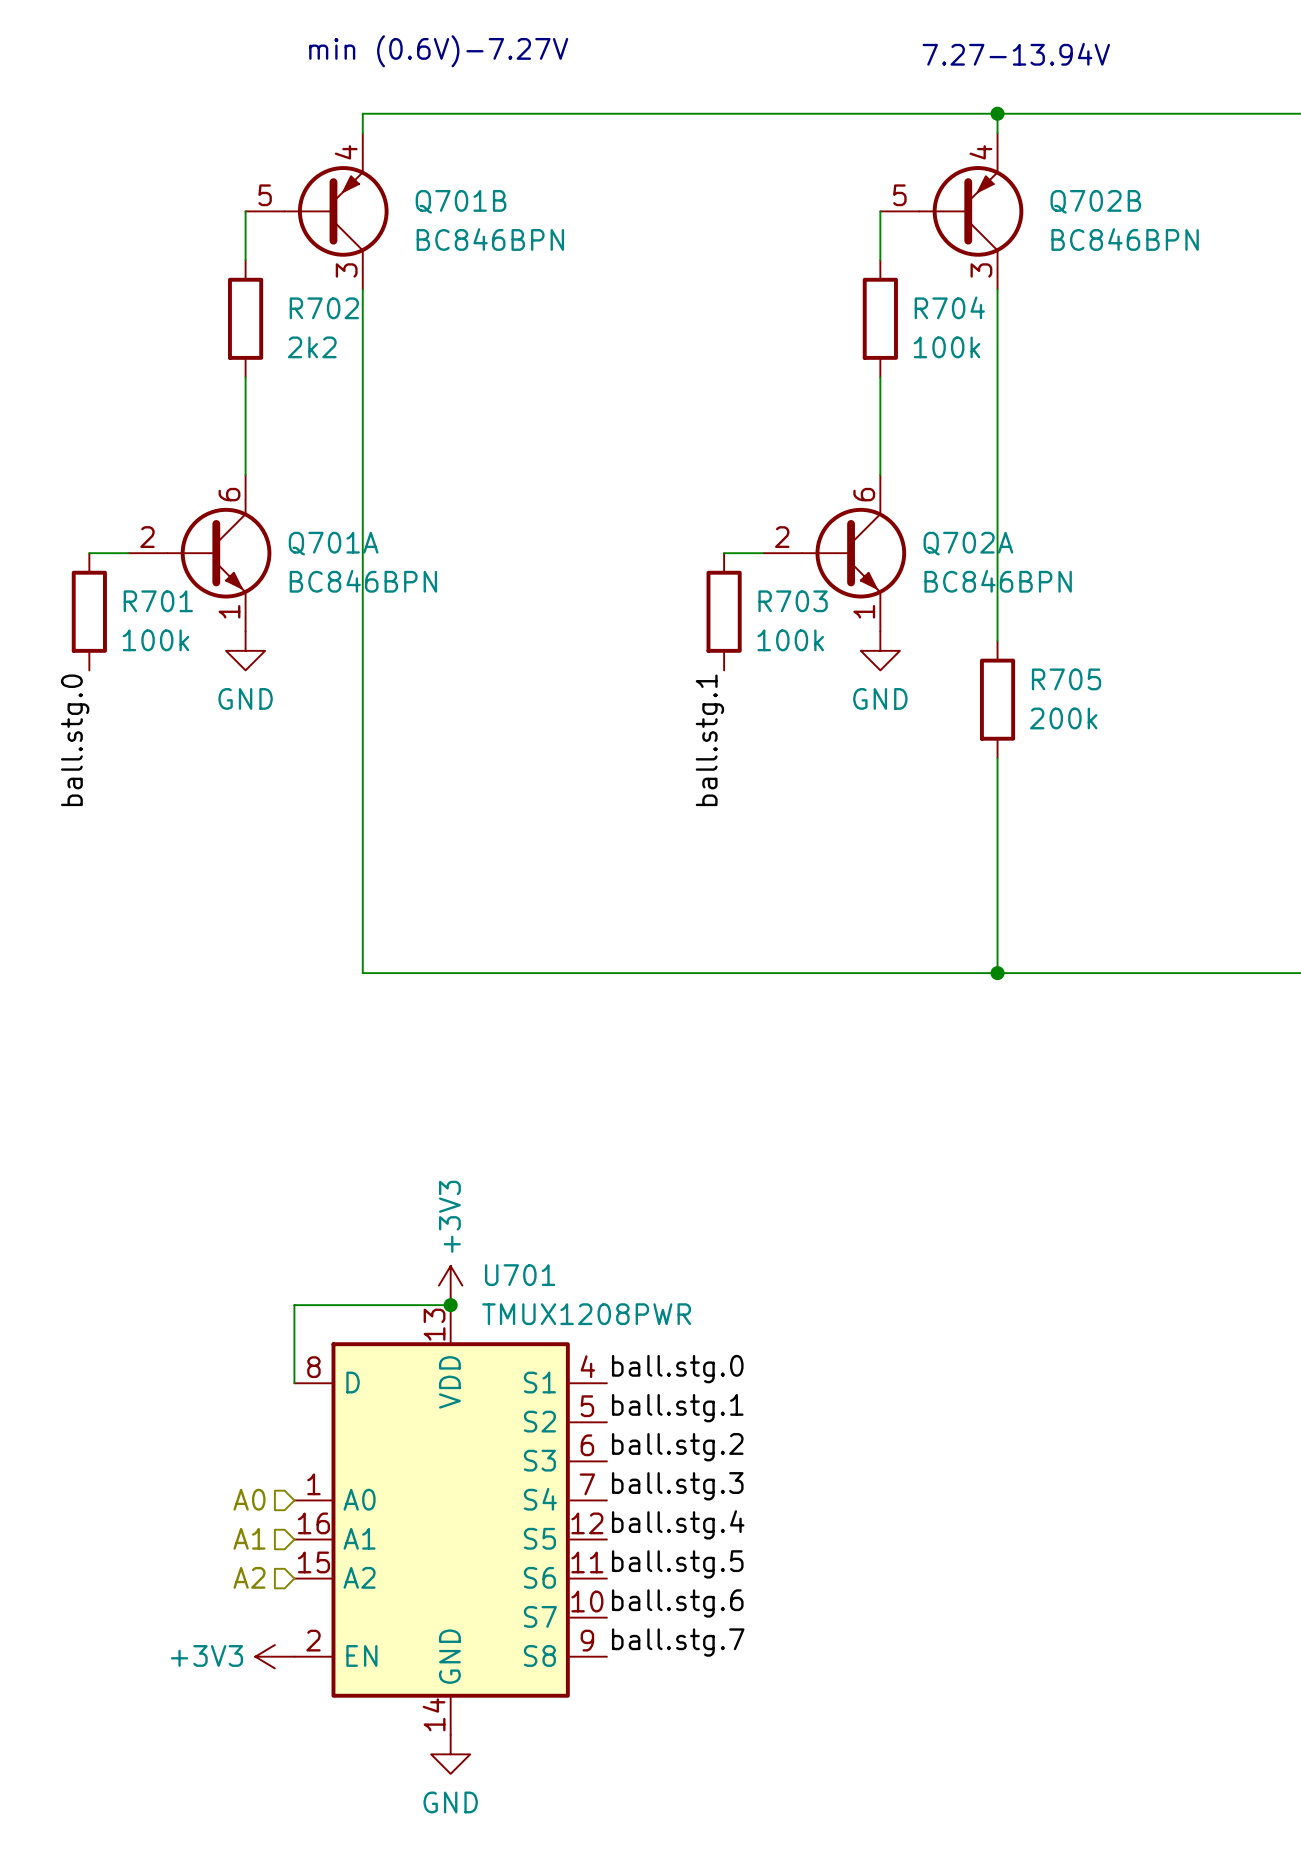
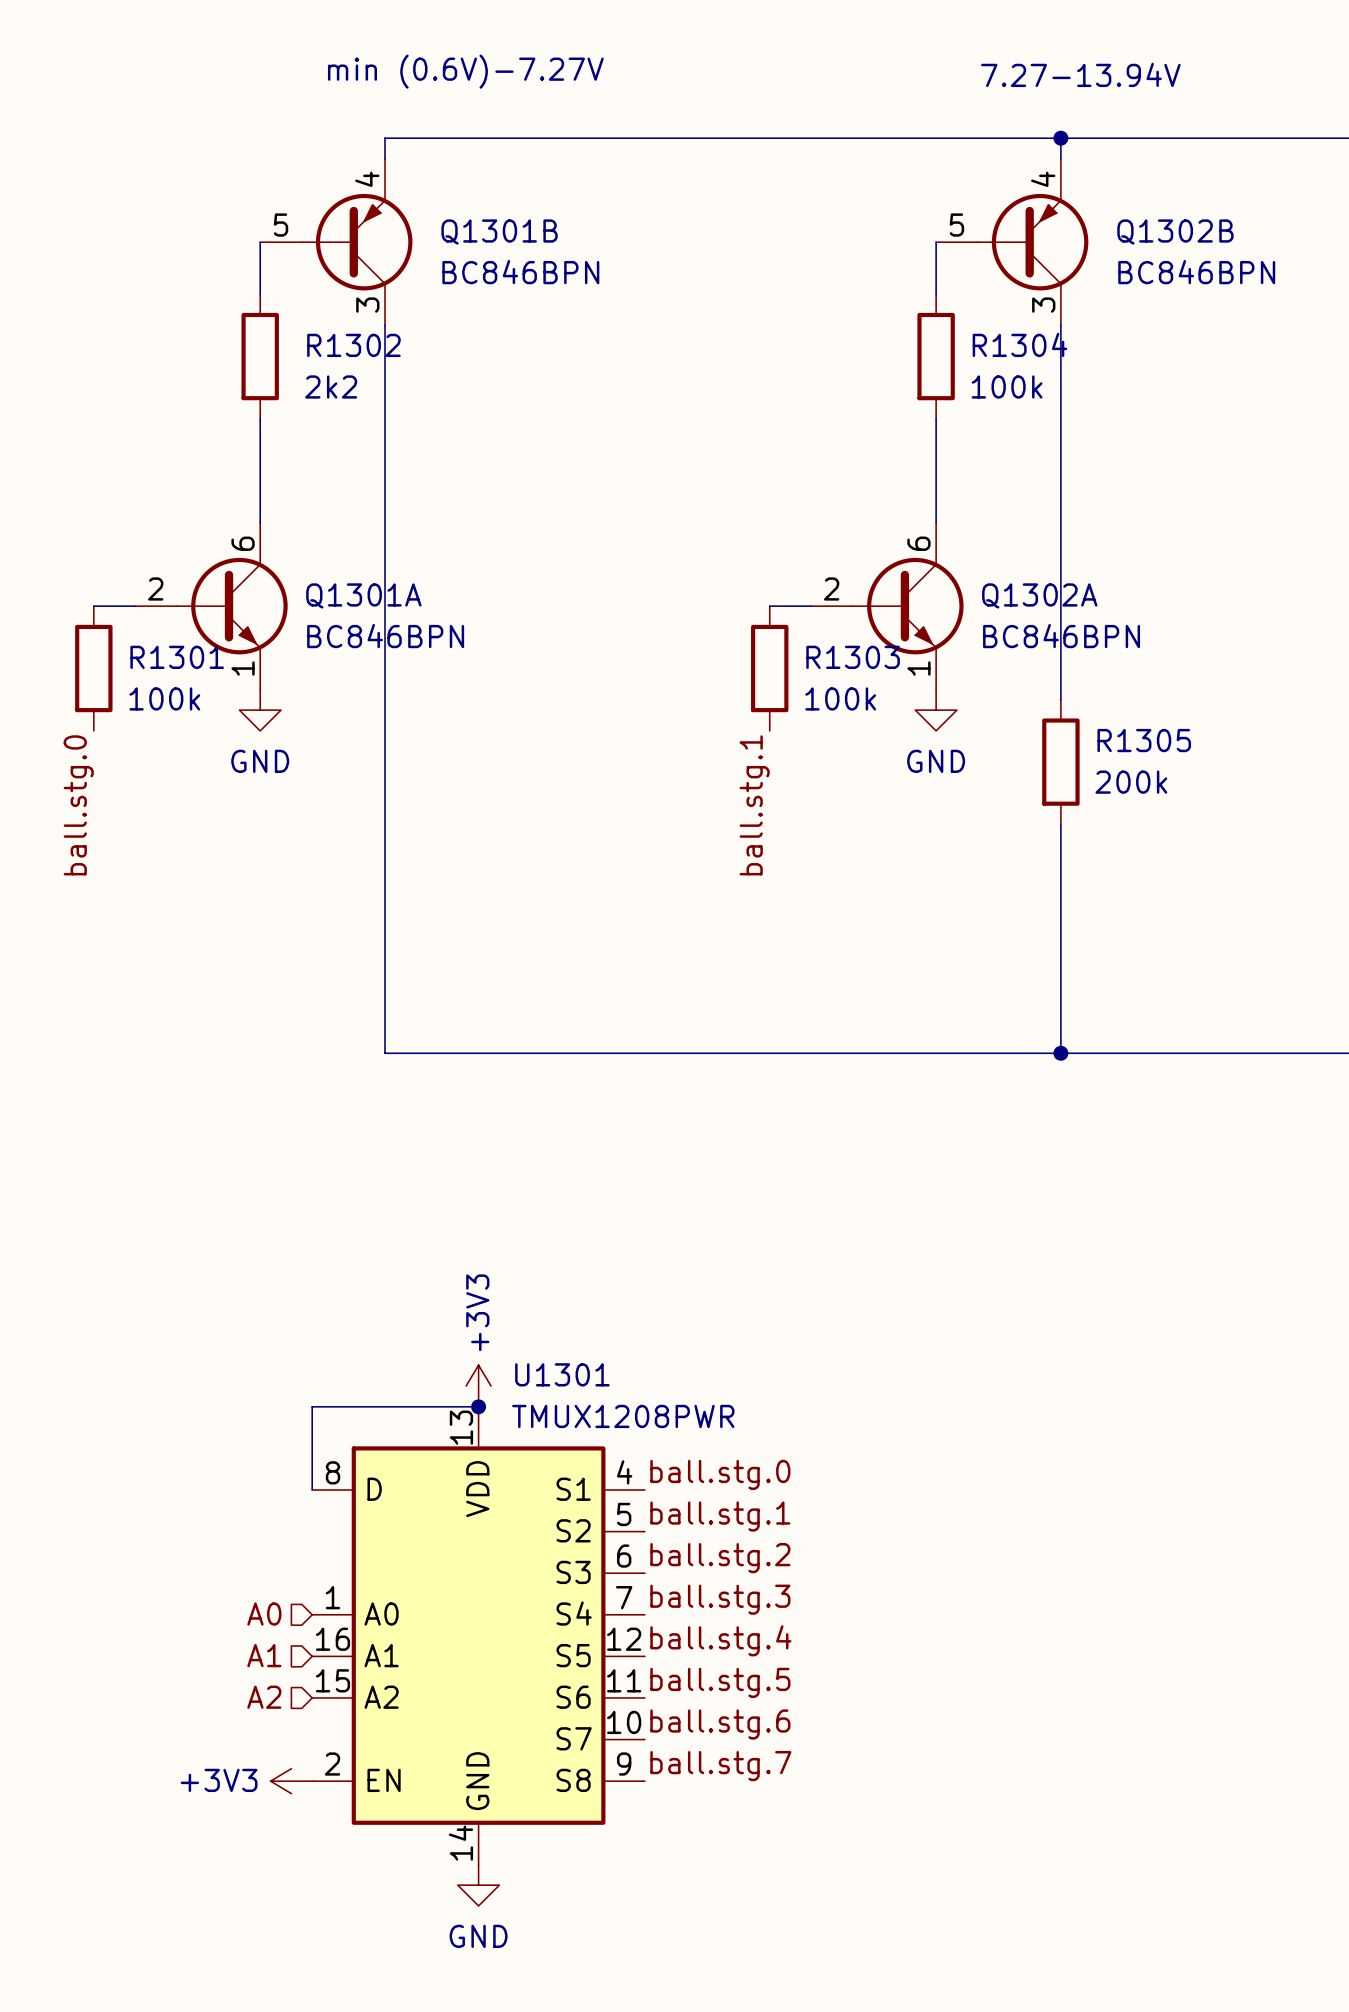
Q701B name: Q701B (461, 201) -> Q1301B (499, 232)
Q702B name: Q702B (1095, 201) -> Q1302B (1175, 232)
R704 name: R704 (949, 307) -> R1304 (1019, 344)
R702 name: R702 (324, 308) -> R1302 (353, 345)
Q701A name: Q701A (333, 543) -> Q1301A (363, 595)
Q702A name: Q702A (968, 543) -> Q1302A (1039, 595)
R701 name: R701 (158, 601) -> R1301 (177, 657)
R703 name: R703 (793, 601) -> R1303 (853, 657)
R705 name: R705 (1066, 679) -> R1305 (1144, 740)
U701 name: U701 (520, 1275) -> U1301 (562, 1374)

